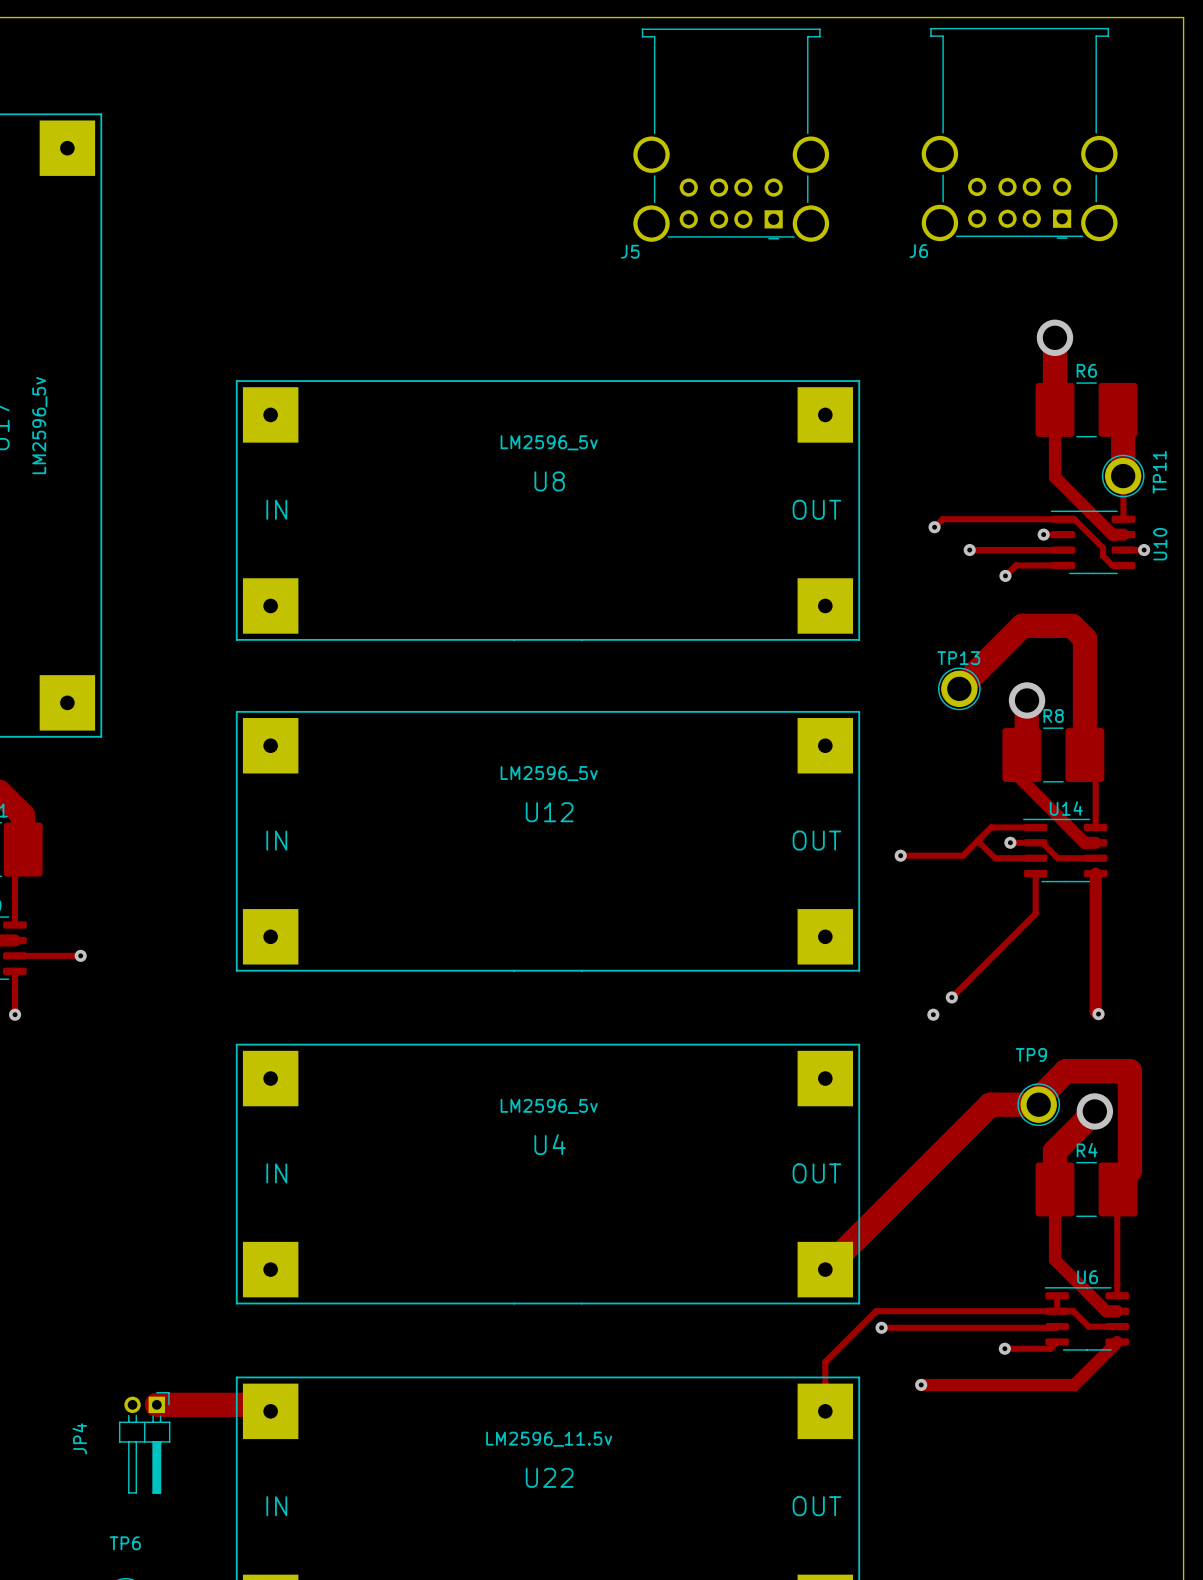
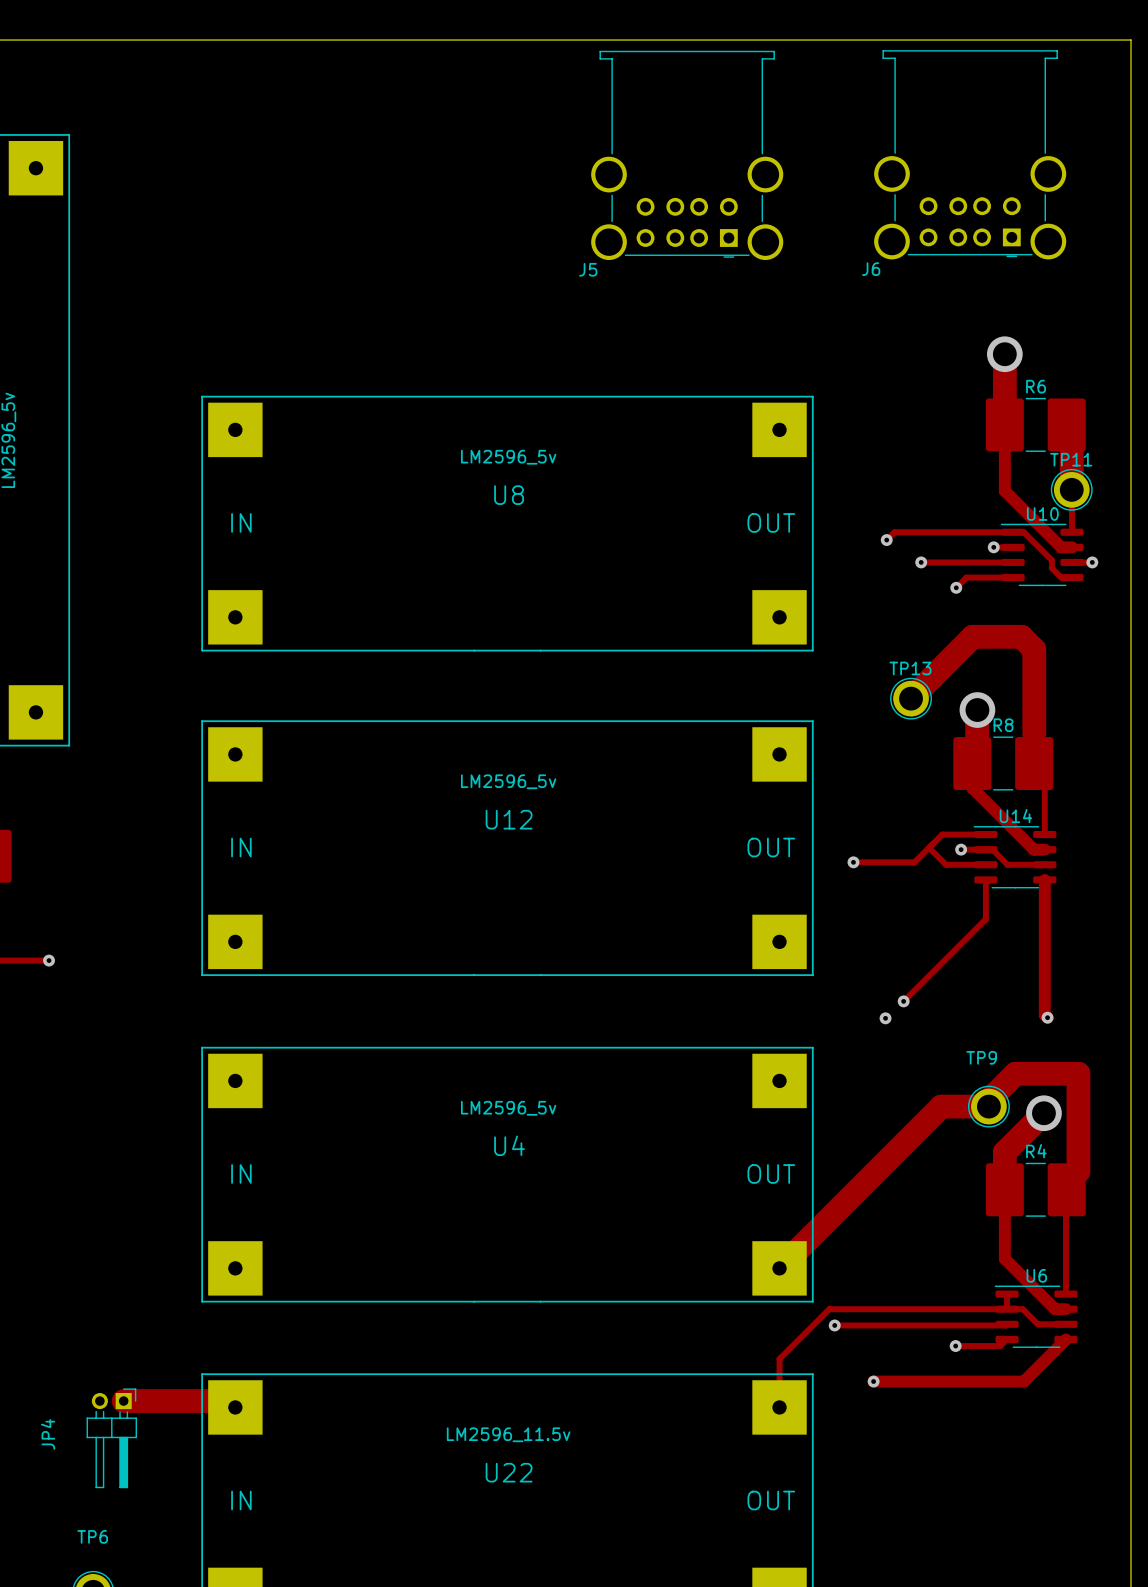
TP11 name rotation: 0° (1159, 472) -> 90° clockwise (1071, 459)
U10 name rotation: 0° (1160, 544) -> 90° clockwise (1042, 514)
U10 name position: U10 (1160, 544) -> U10 (1042, 514)

